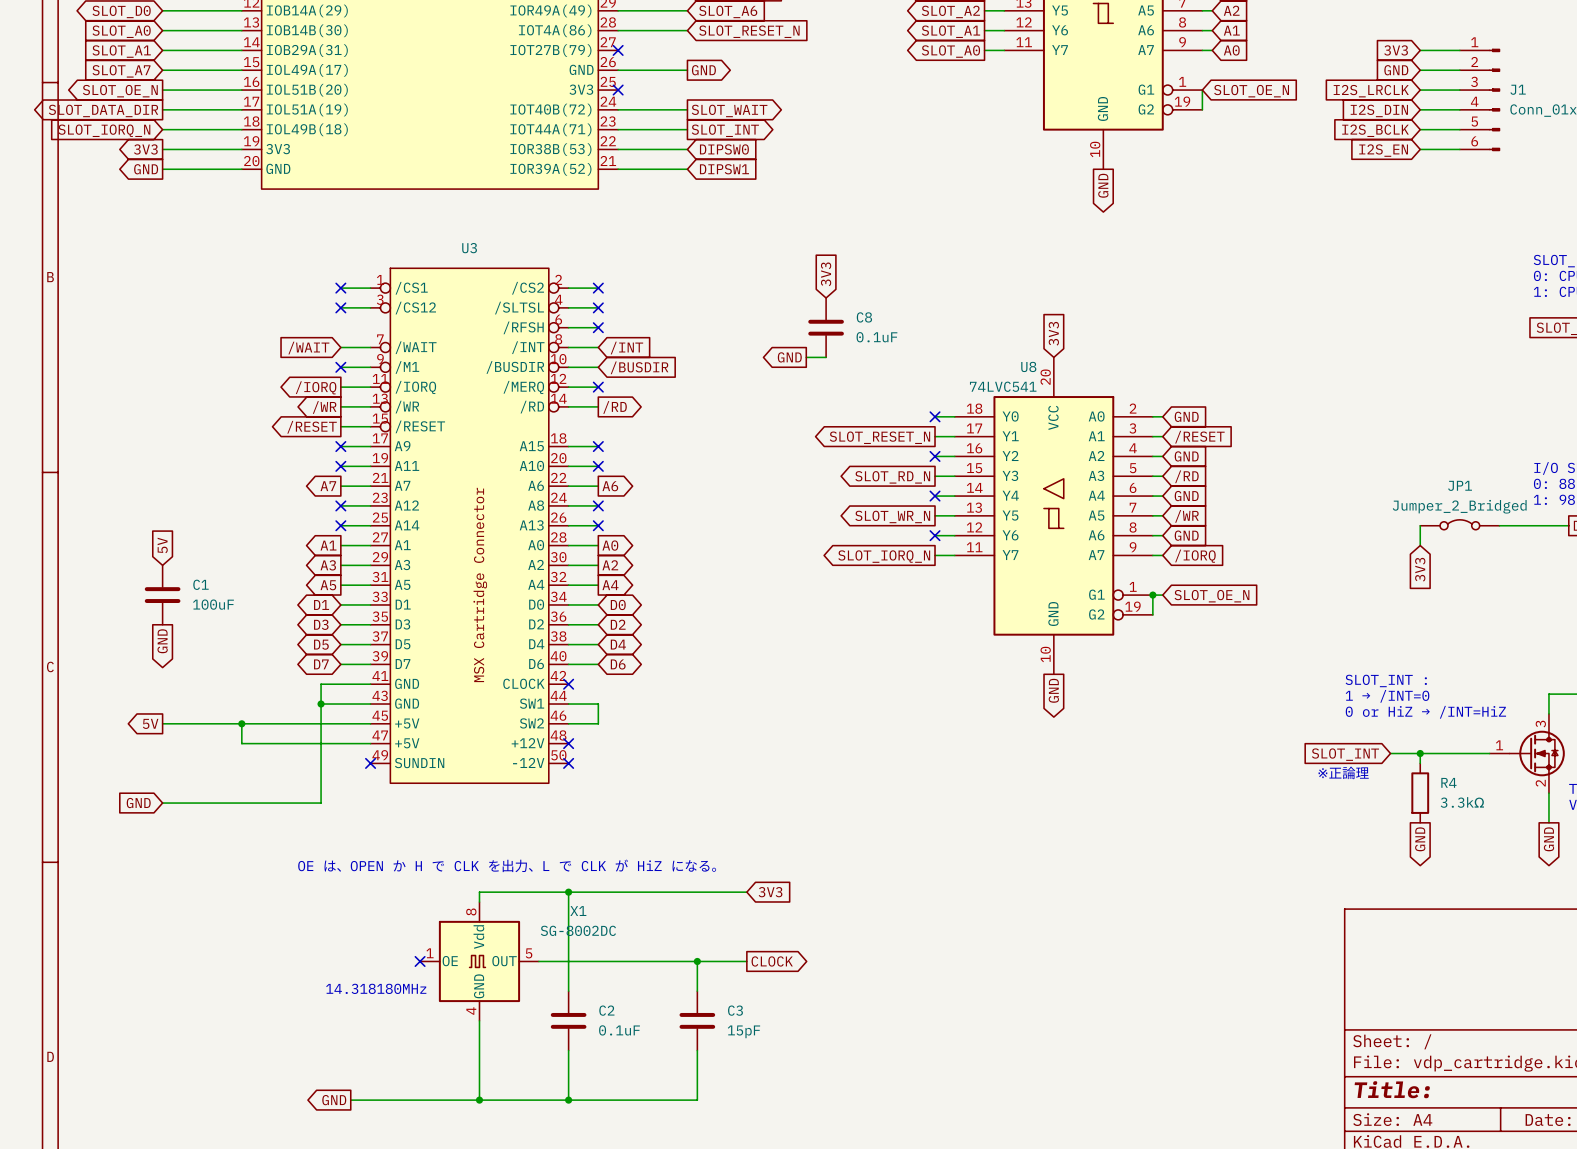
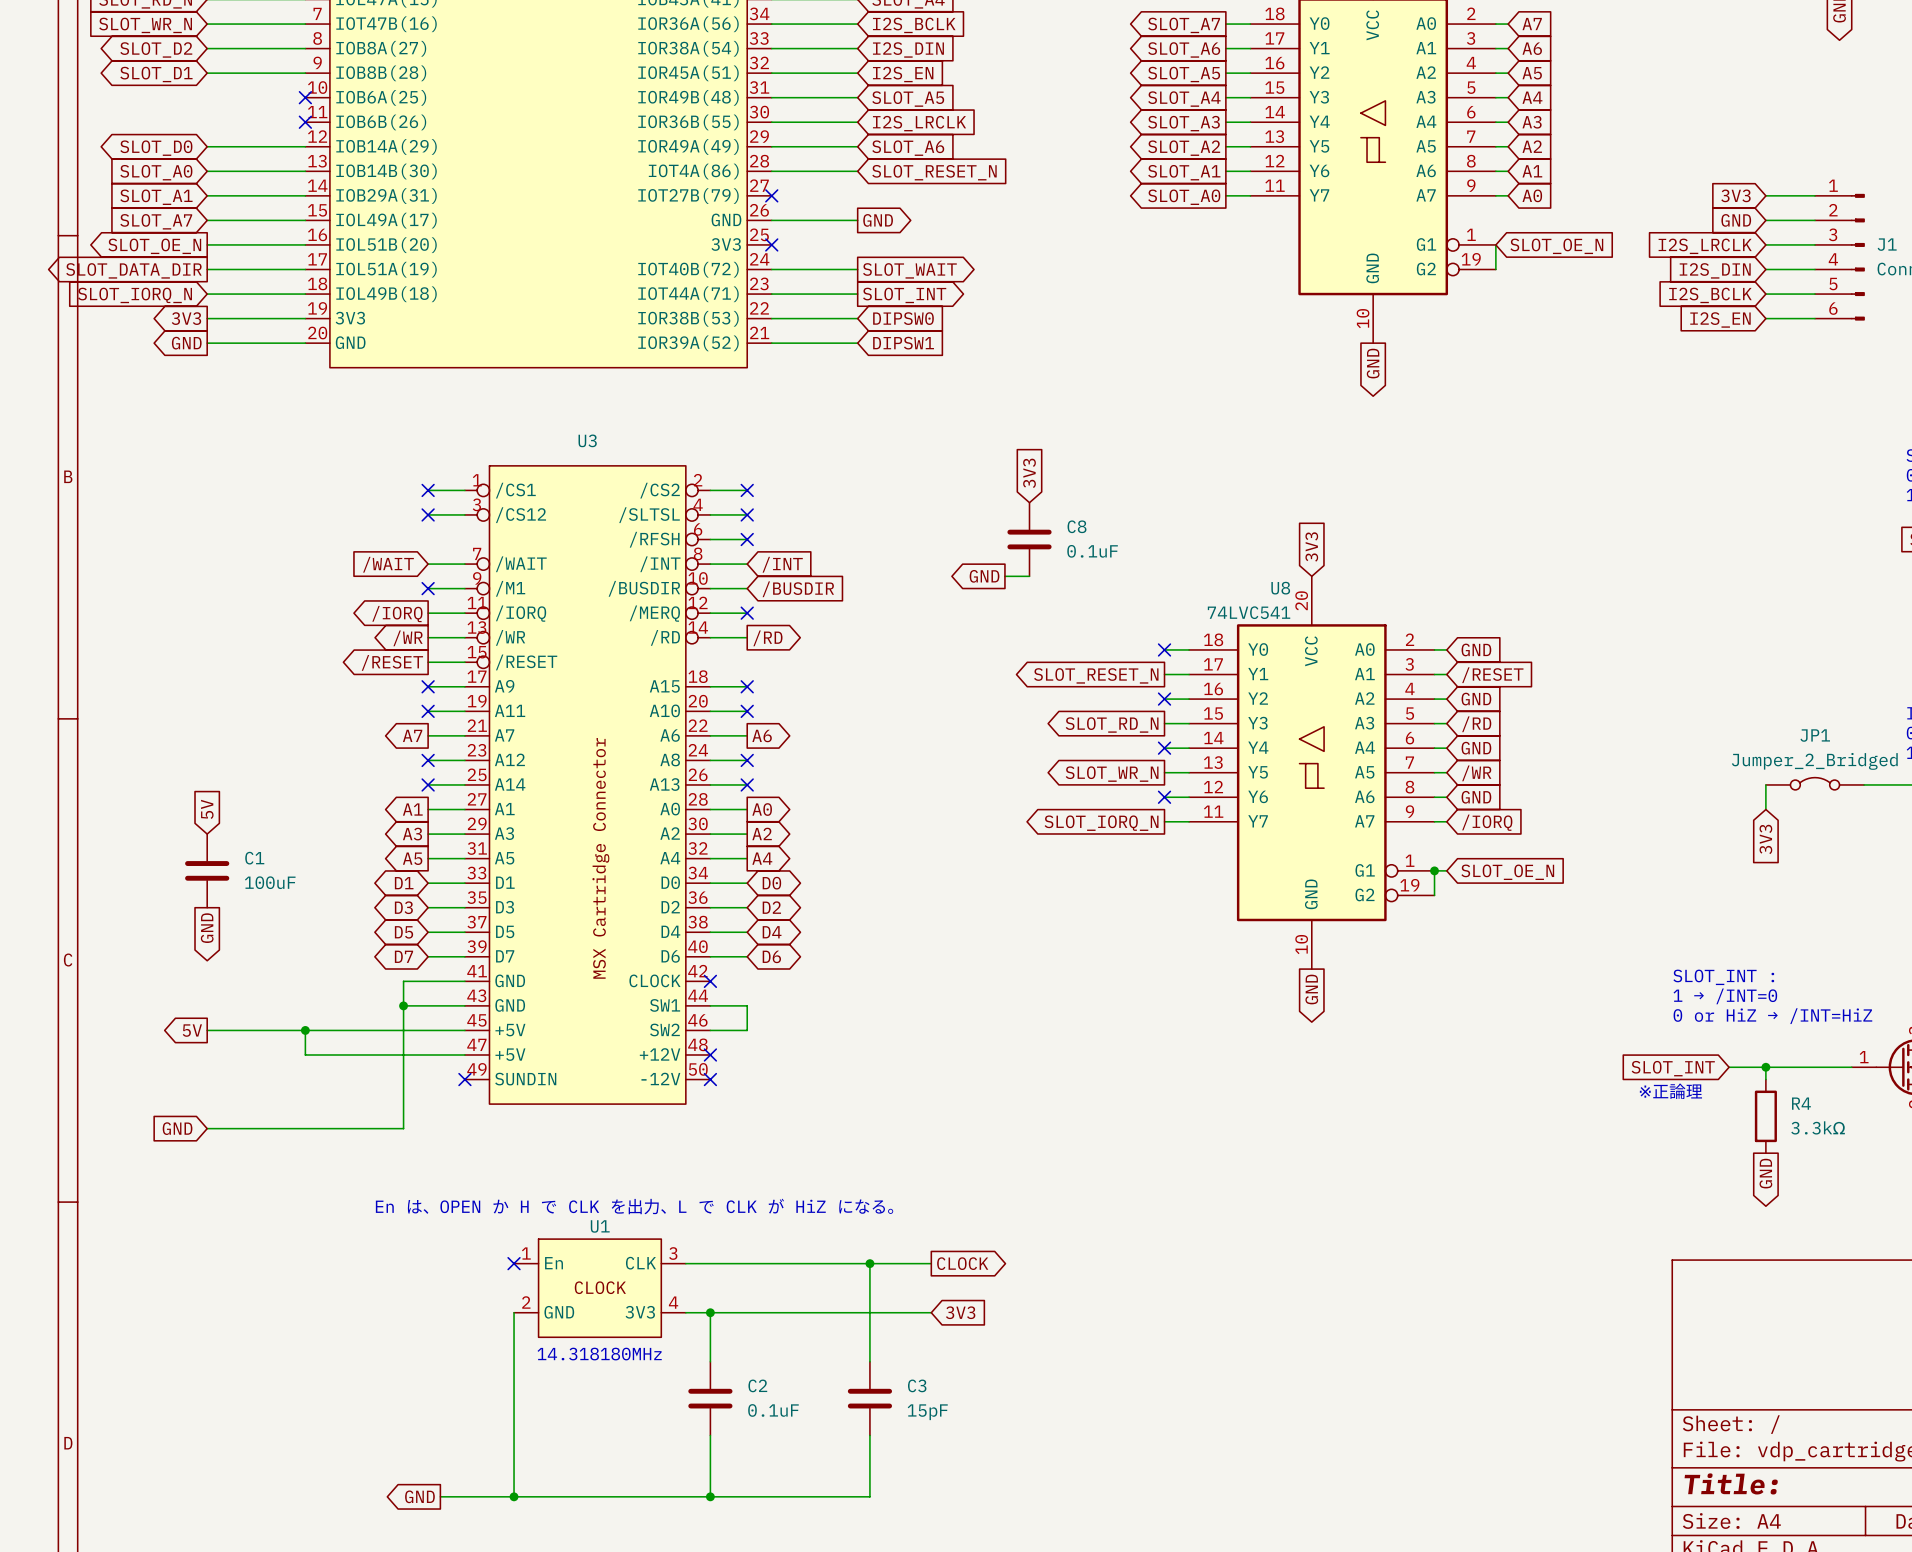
text: OE は、OPEN か H で CLK を出力、L で CLK が HiZ になる。 (507, 865) -> En は、OPEN か H で CLK を出力、L で CLK が HiZ になる。 (634, 1206)
wire: (568, 892) (568, 951) -> none
junction: (568, 892) -> none
wire: (746, 892) (479, 892) (479, 902) -> none
global label position: 3V3 (770, 892) -> 3V3 (960, 1312)
no-connect mark: none -> (514, 1263)
wire: none -> (685, 1263) (931, 1263)
wire: none -> (869, 1263) (869, 1325)
junction: none -> (869, 1263)
U1: none -> (599, 1288)
wire: none -> (514, 1312) (514, 1496)
wire: none -> (685, 1312) (931, 1312)
junction: none -> (710, 1312)
no-connect mark: (420, 961) -> none
X1: SG-8002DC (479, 961) -> none
wire: (538, 961) (746, 961) -> none
junction: (697, 961) -> none
global label position: CLOCK (772, 961) -> CLOCK (962, 1263)
text position: 14.318180MHz (376, 988) -> 14.318180MHz (599, 1354)
wire: (479, 1020) (479, 1100) -> none
junction: none -> (514, 1496)
junction: (479, 1100) -> none

